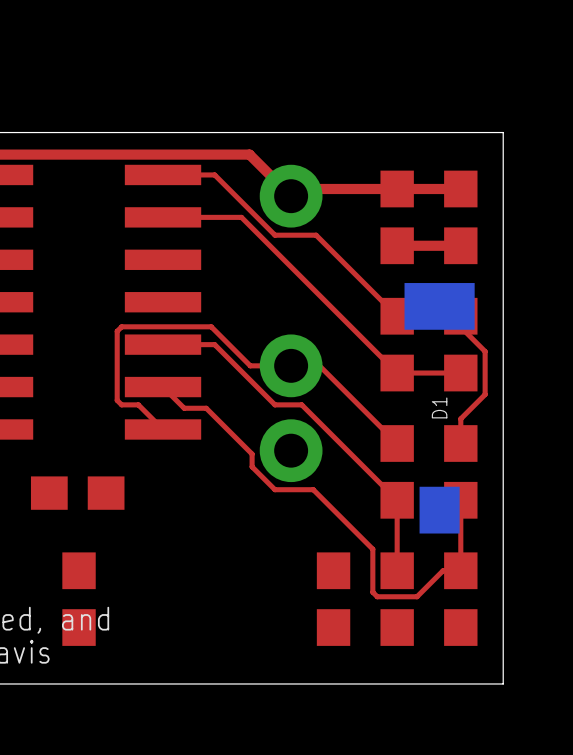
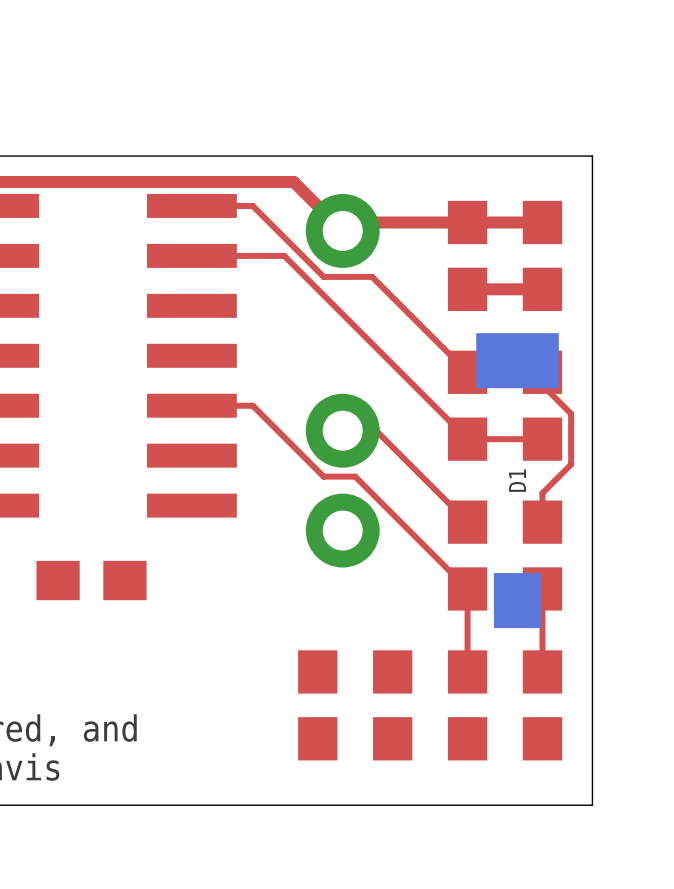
top track: (291, 365) (250, 365) (211, 326) (121, 326) (117, 331) (117, 400) (121, 404) (138, 404) (163, 429) -> none
top track: (163, 387) (184, 408) (206, 408) (252, 454) (252, 466) (274, 489) (313, 489) (372, 549) (372, 592) (377, 596) (417, 596) (443, 570) (460, 570) -> none
part position: (79, 599) -> (317, 705)

